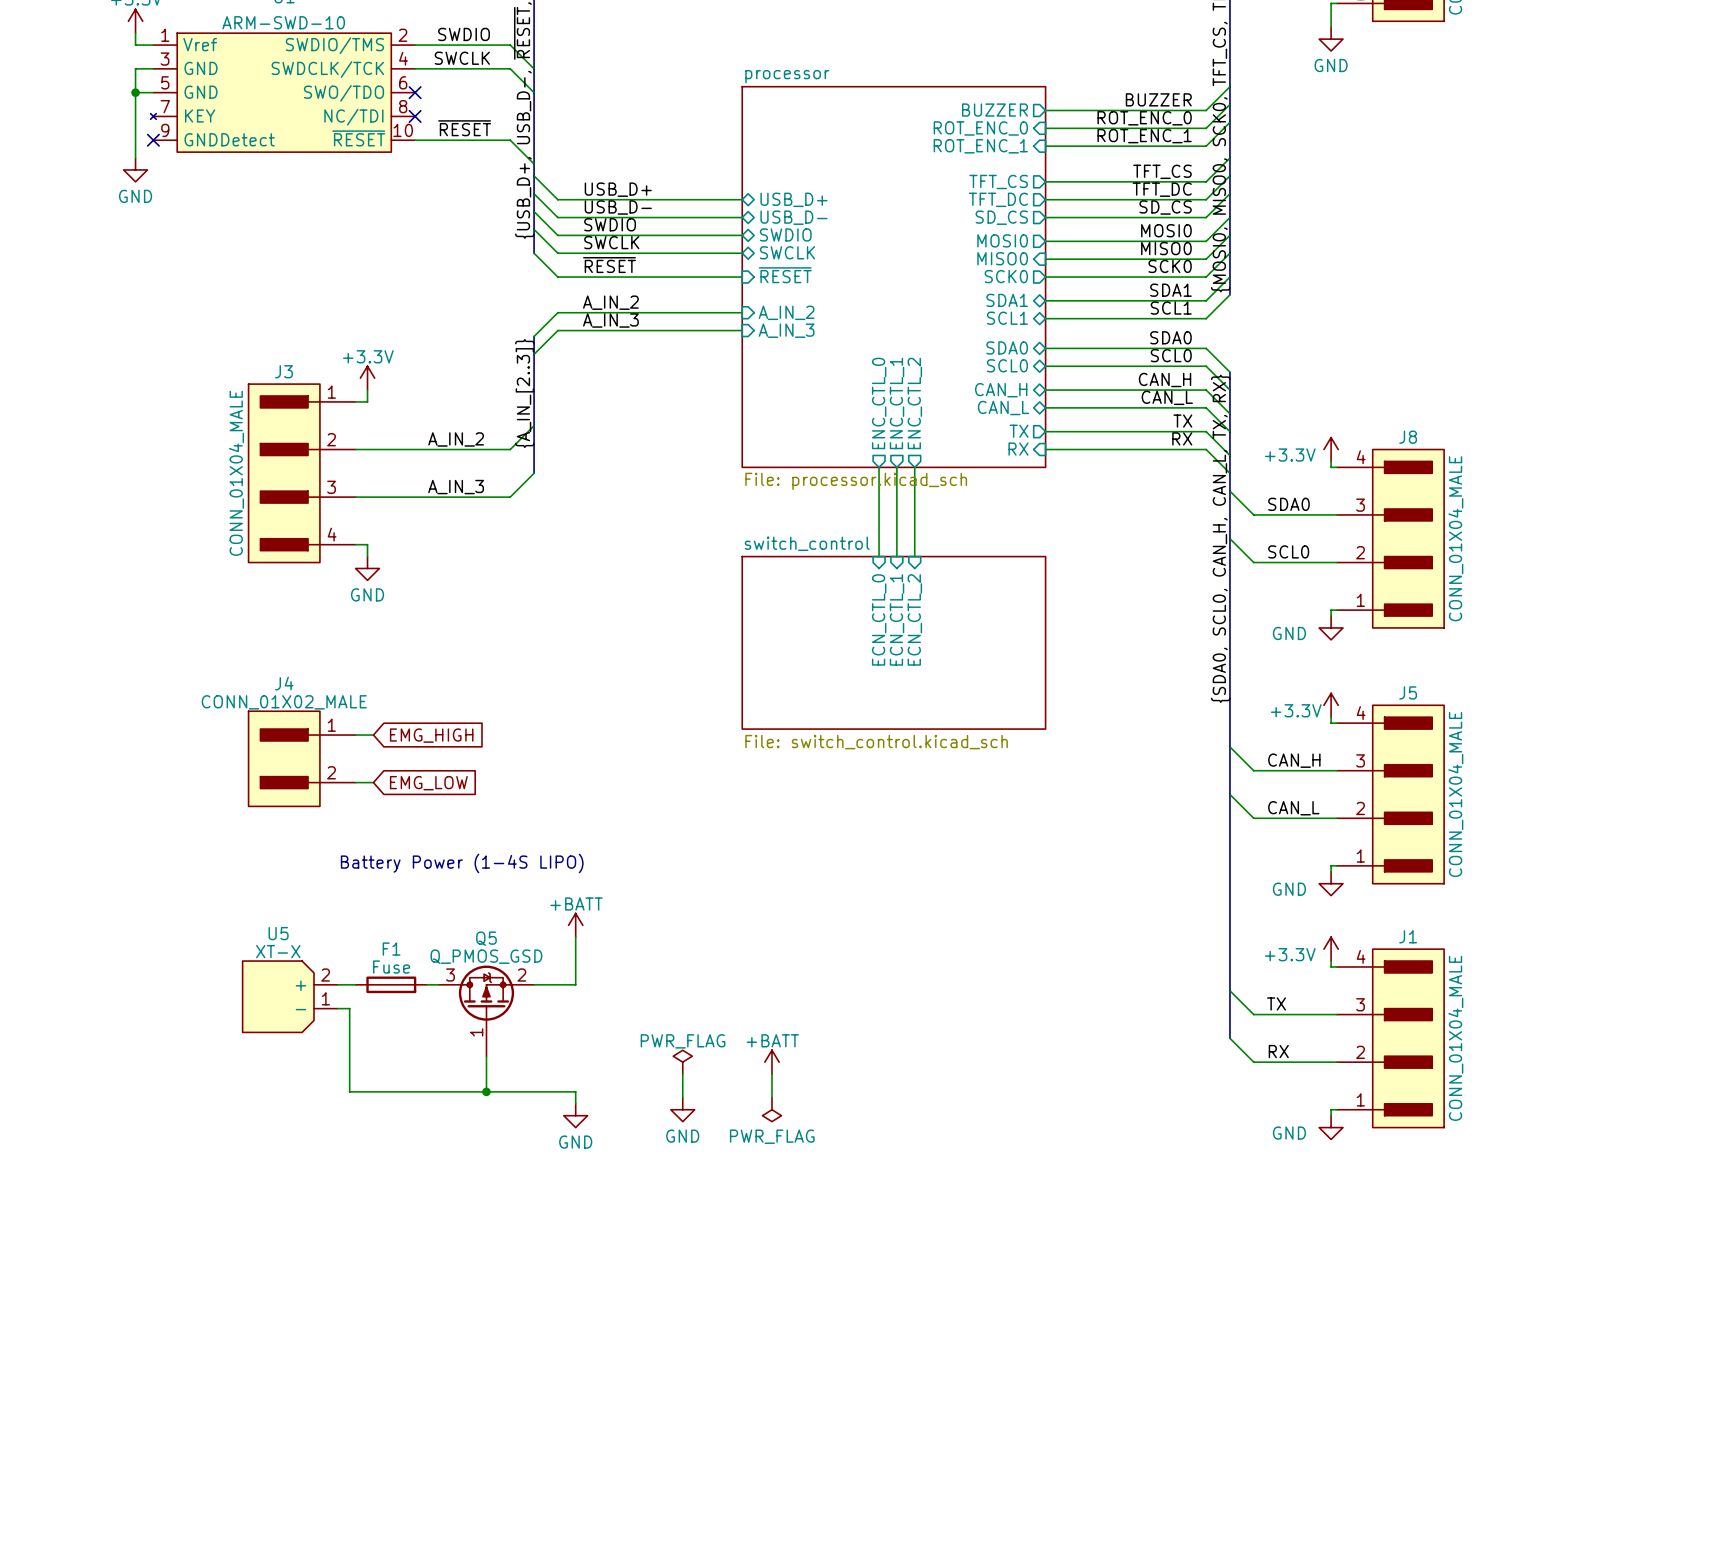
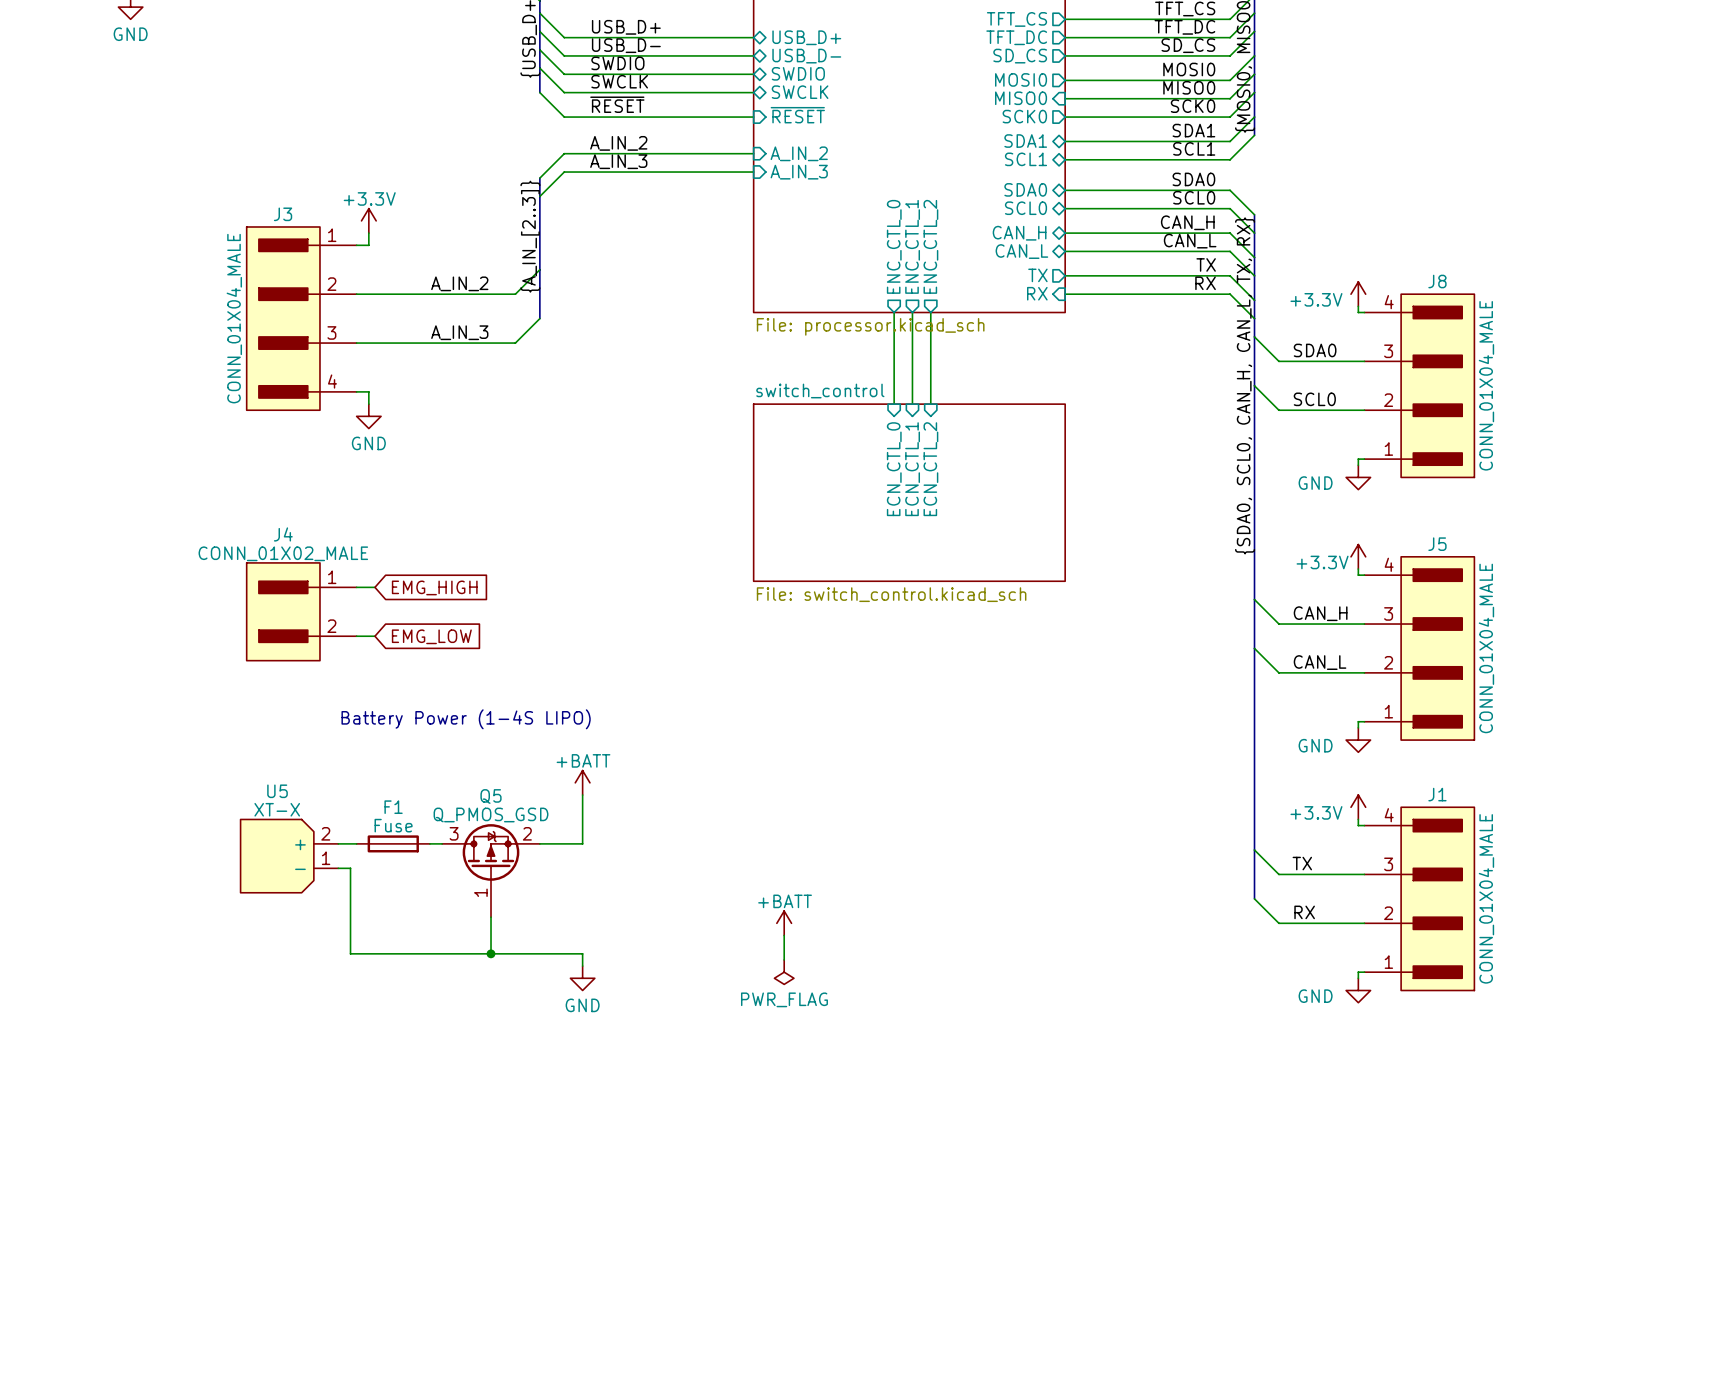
power symbol: PWR_FLAG (682, 1062) -> none
wire: (682, 1074) (682, 1097) -> none
power symbol: GND (682, 1109) -> none

